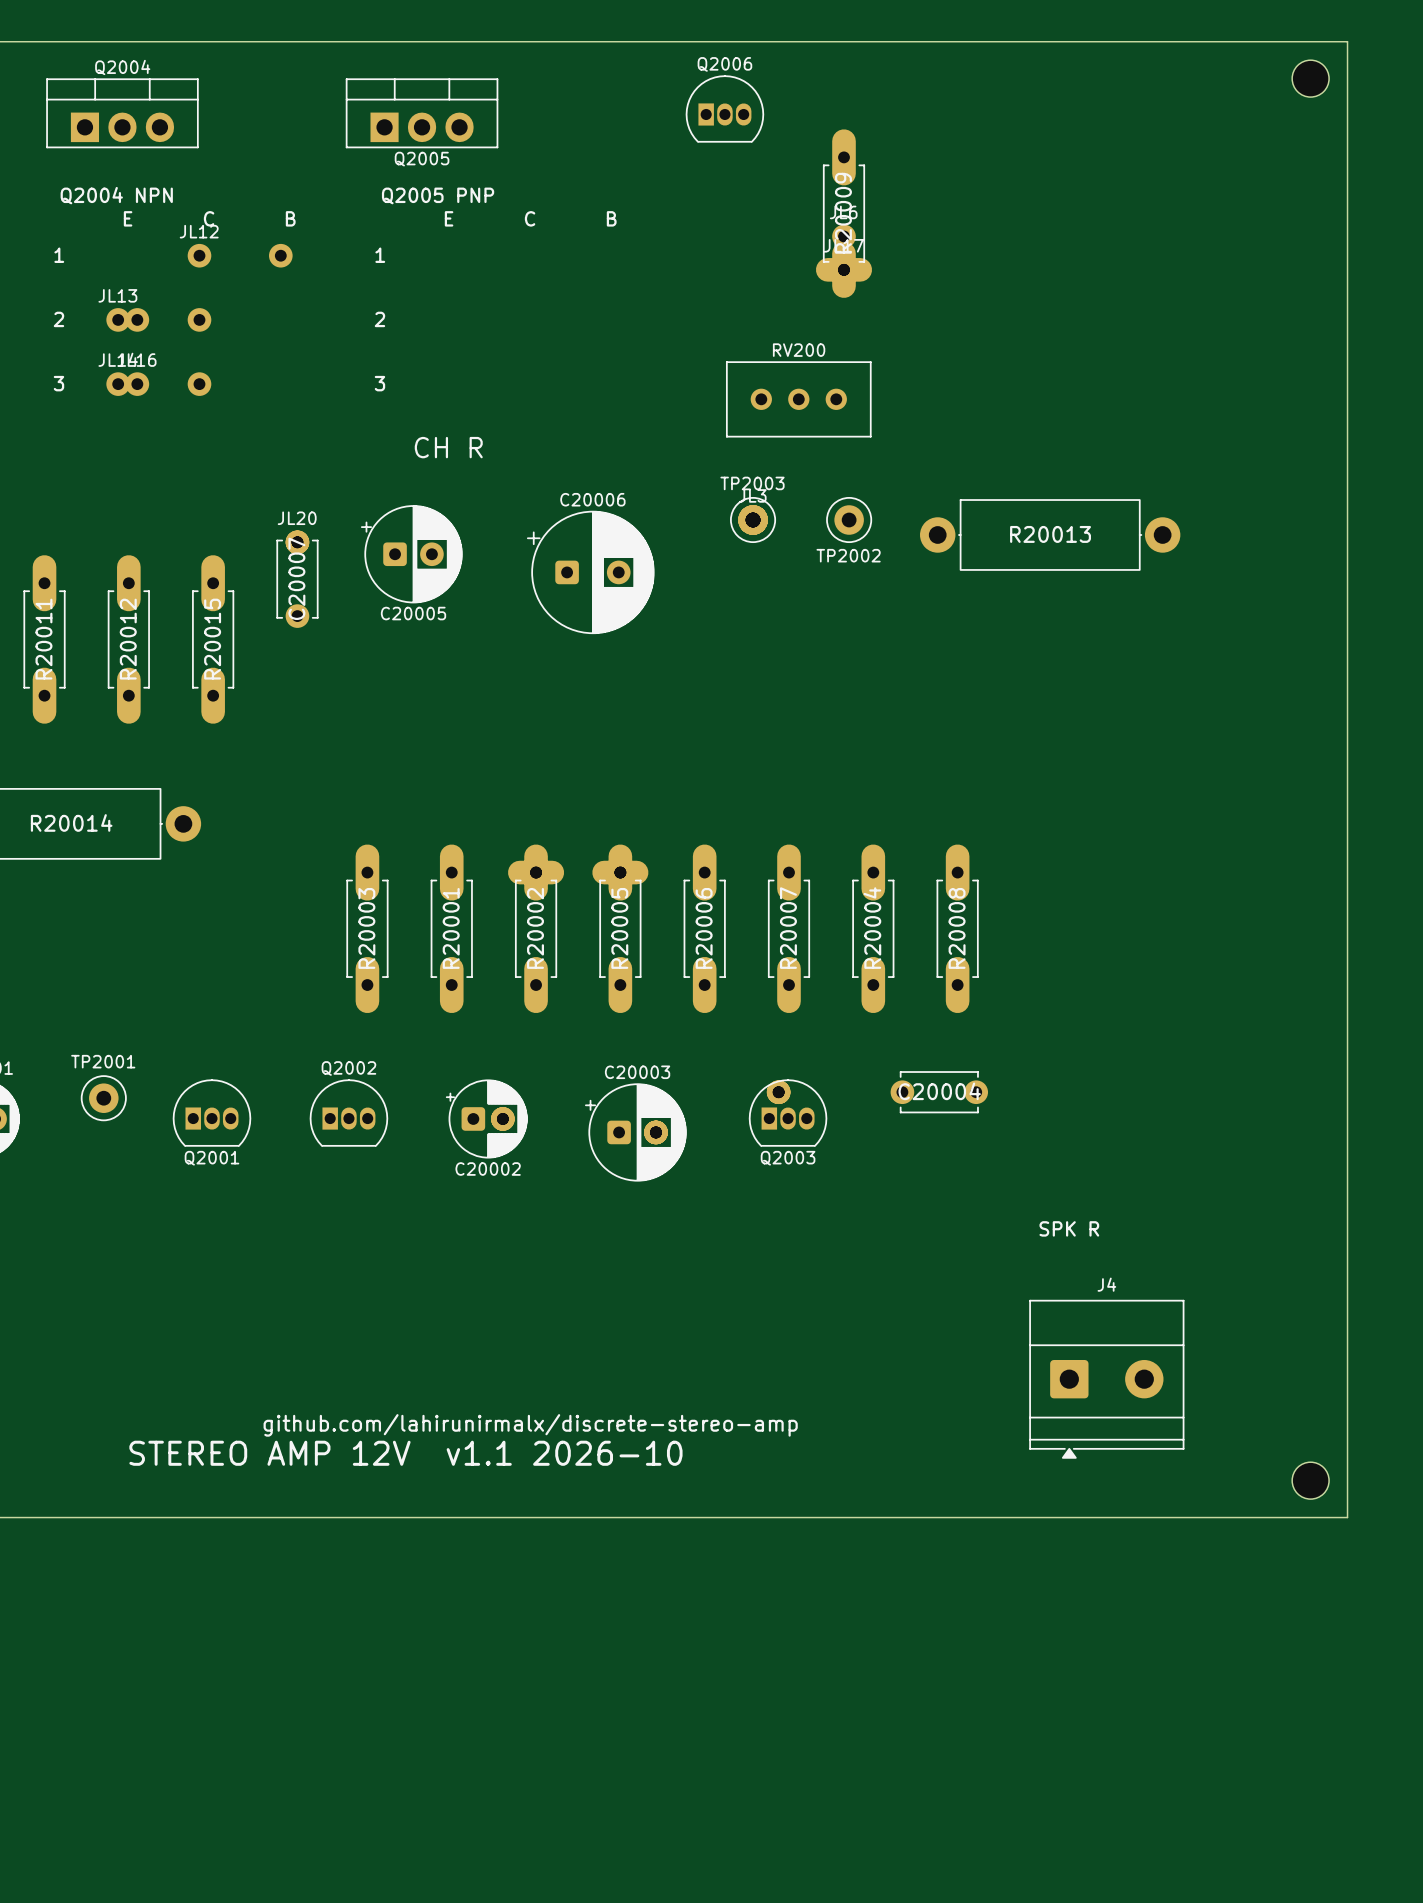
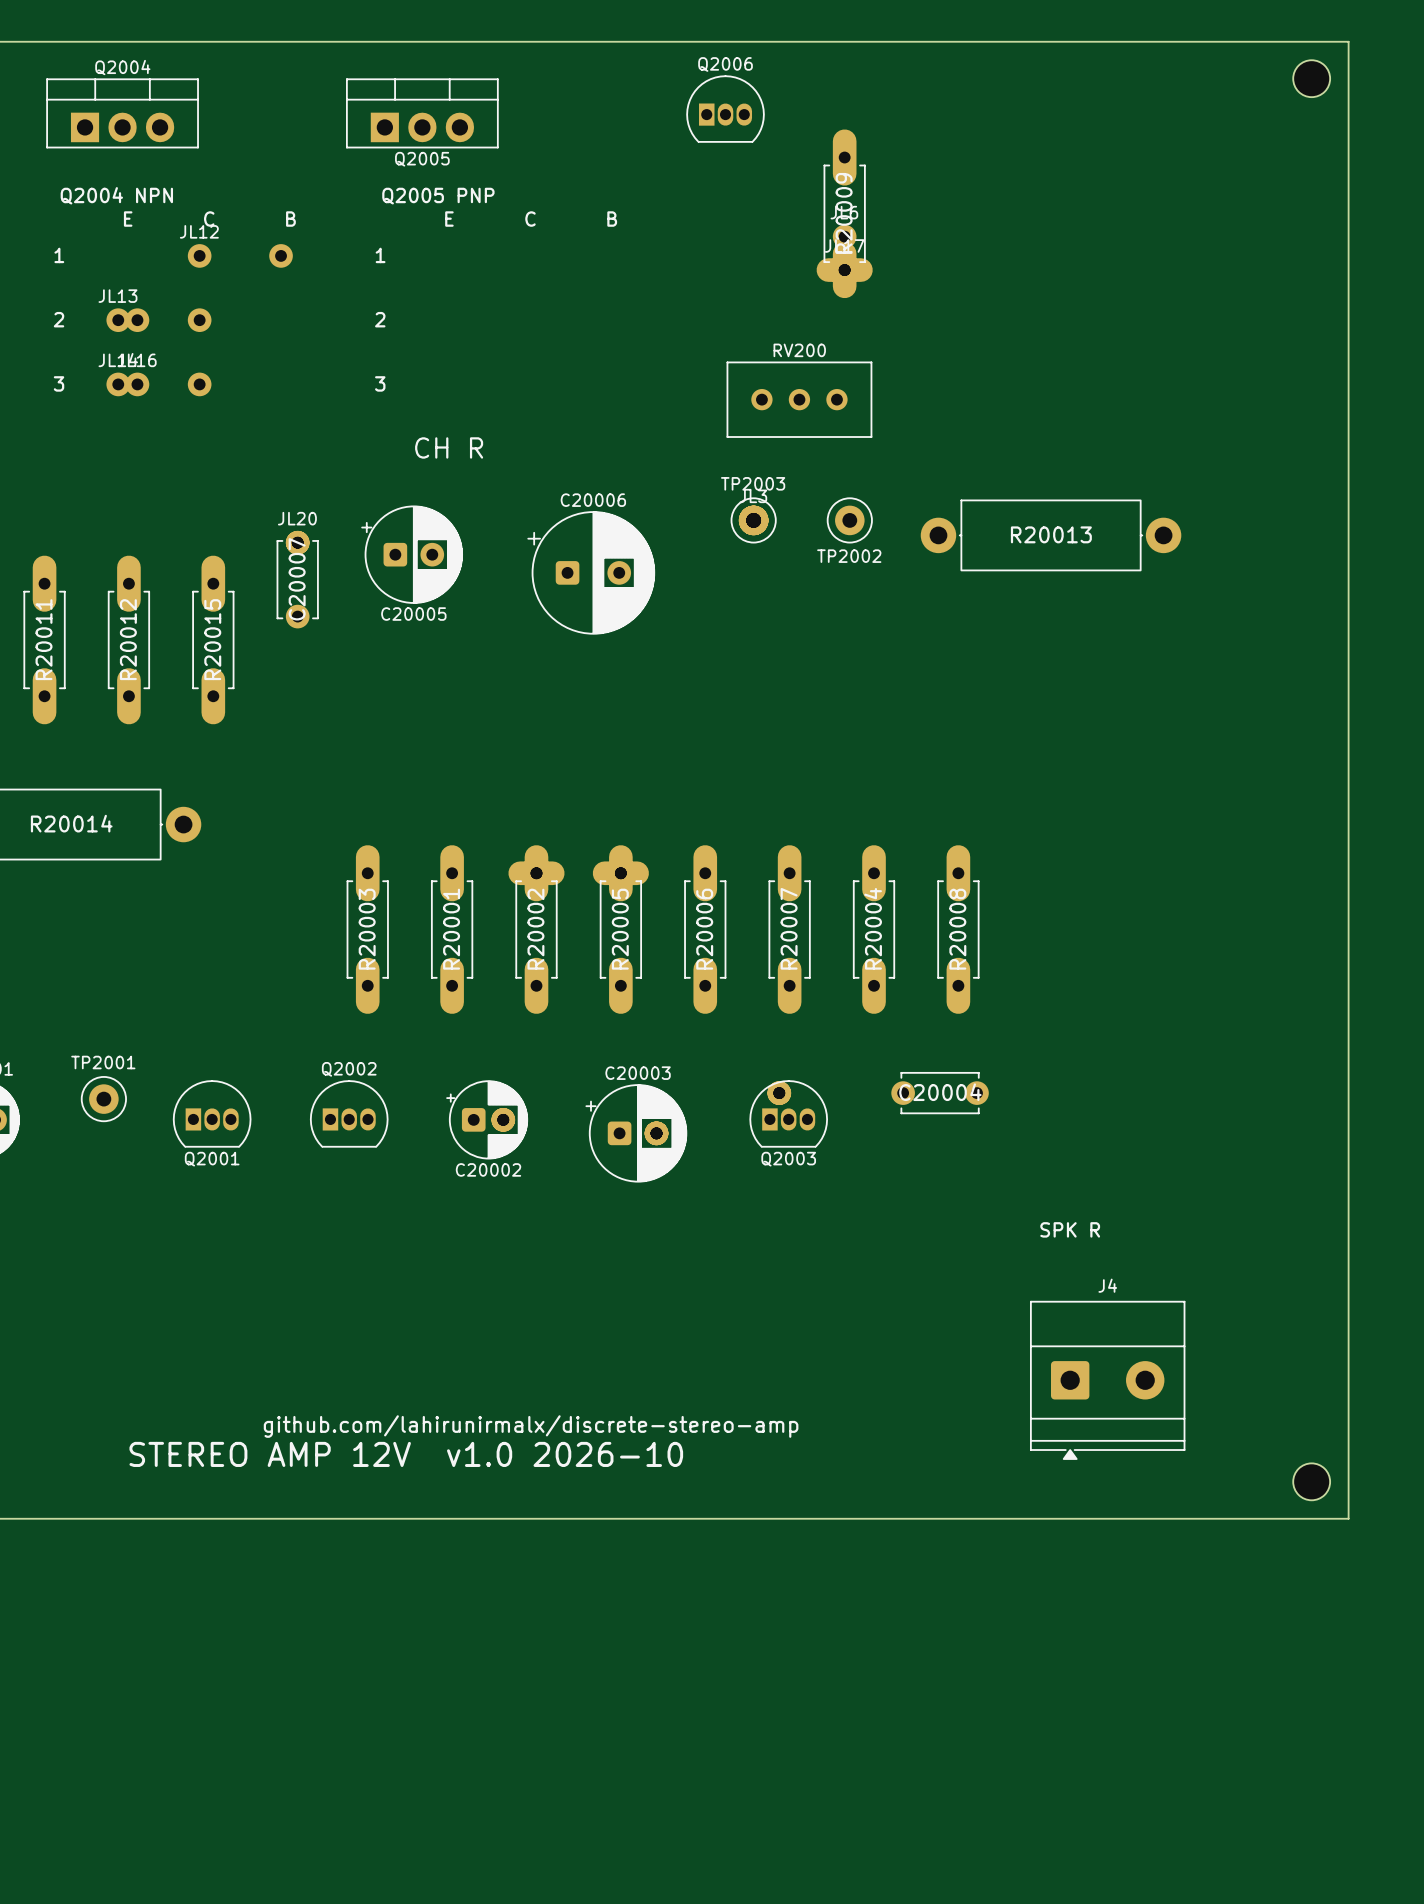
text: STEREO AMP 12V v1.1 2026-10 (405, 1453) -> STEREO AMP 12V v1.0 2026-10 (406, 1454)

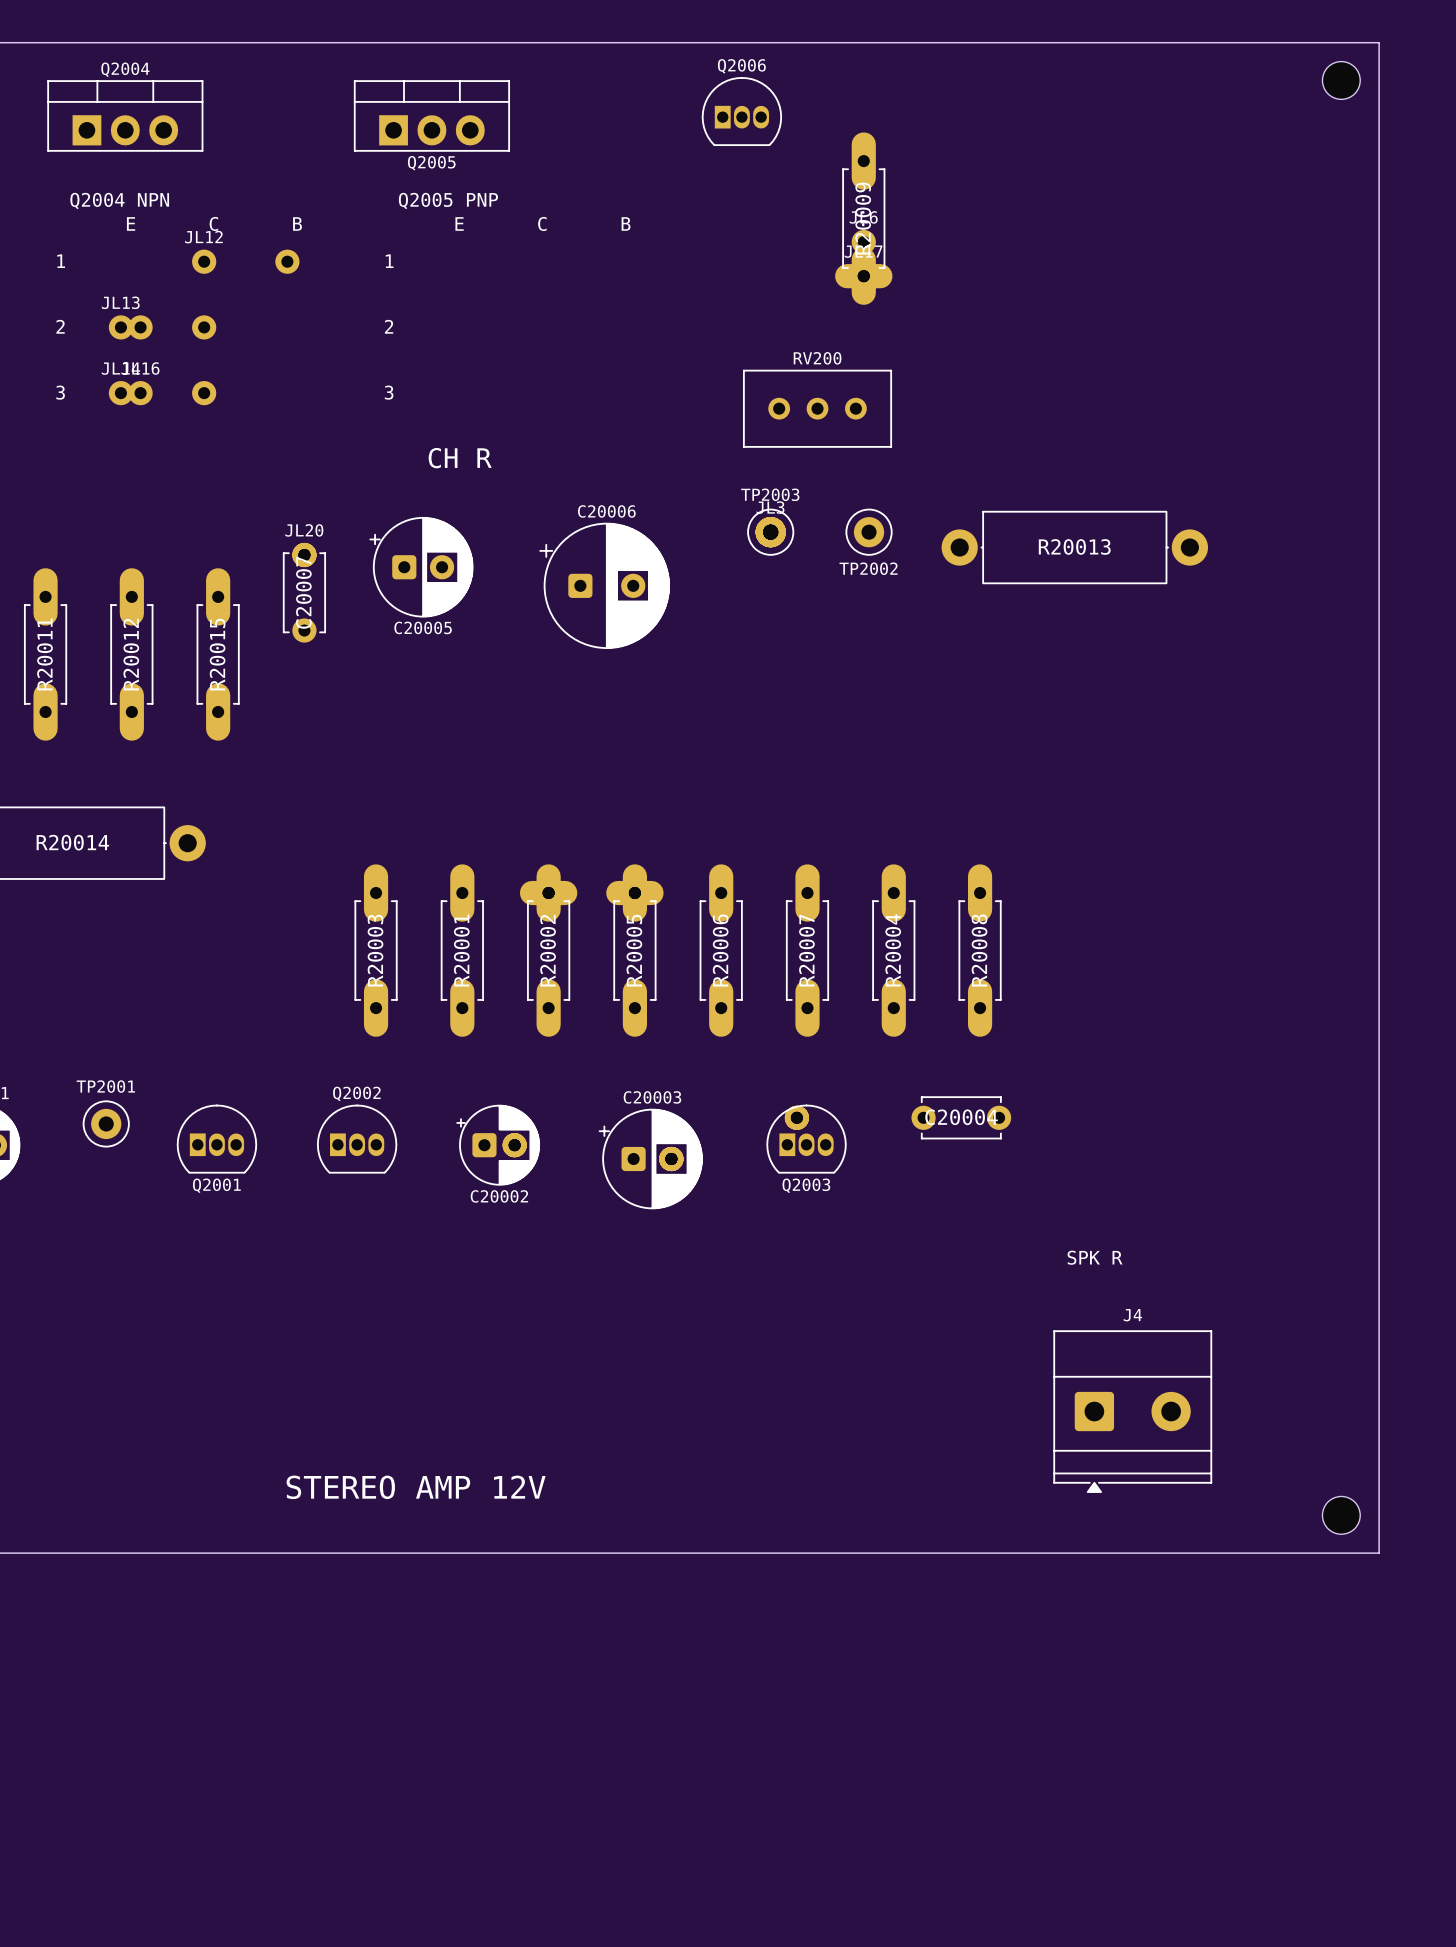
text: github.com/lahirunirmalx/discrete-stereo-amp (531, 1426) -> none
text: STEREO AMP 12V v1.0 2026-10 (406, 1454) -> STEREO AMP 12V (416, 1487)

